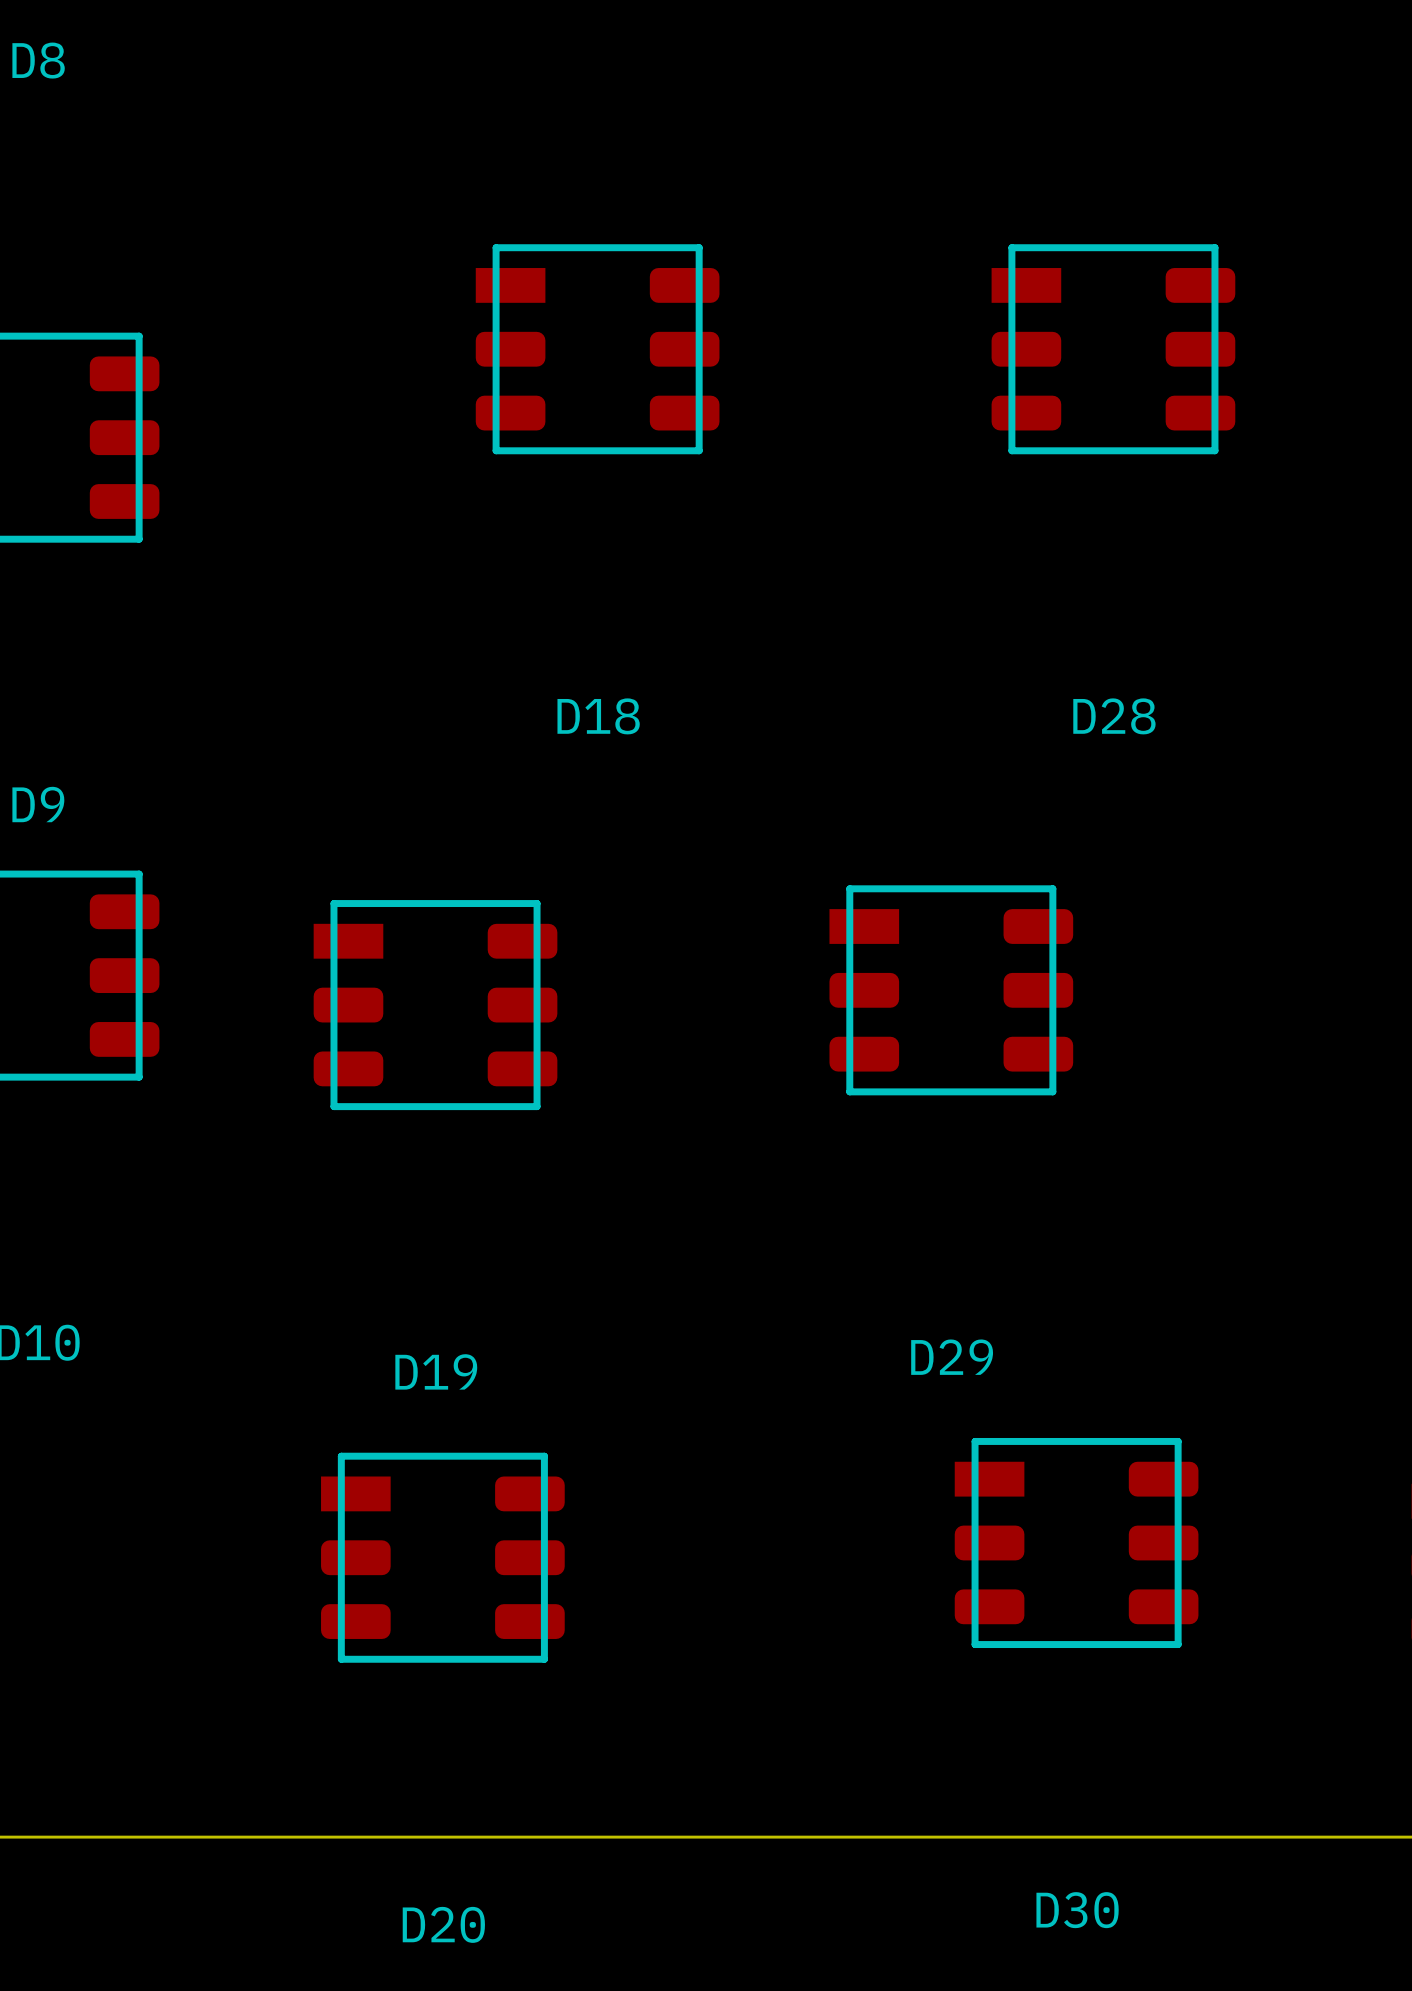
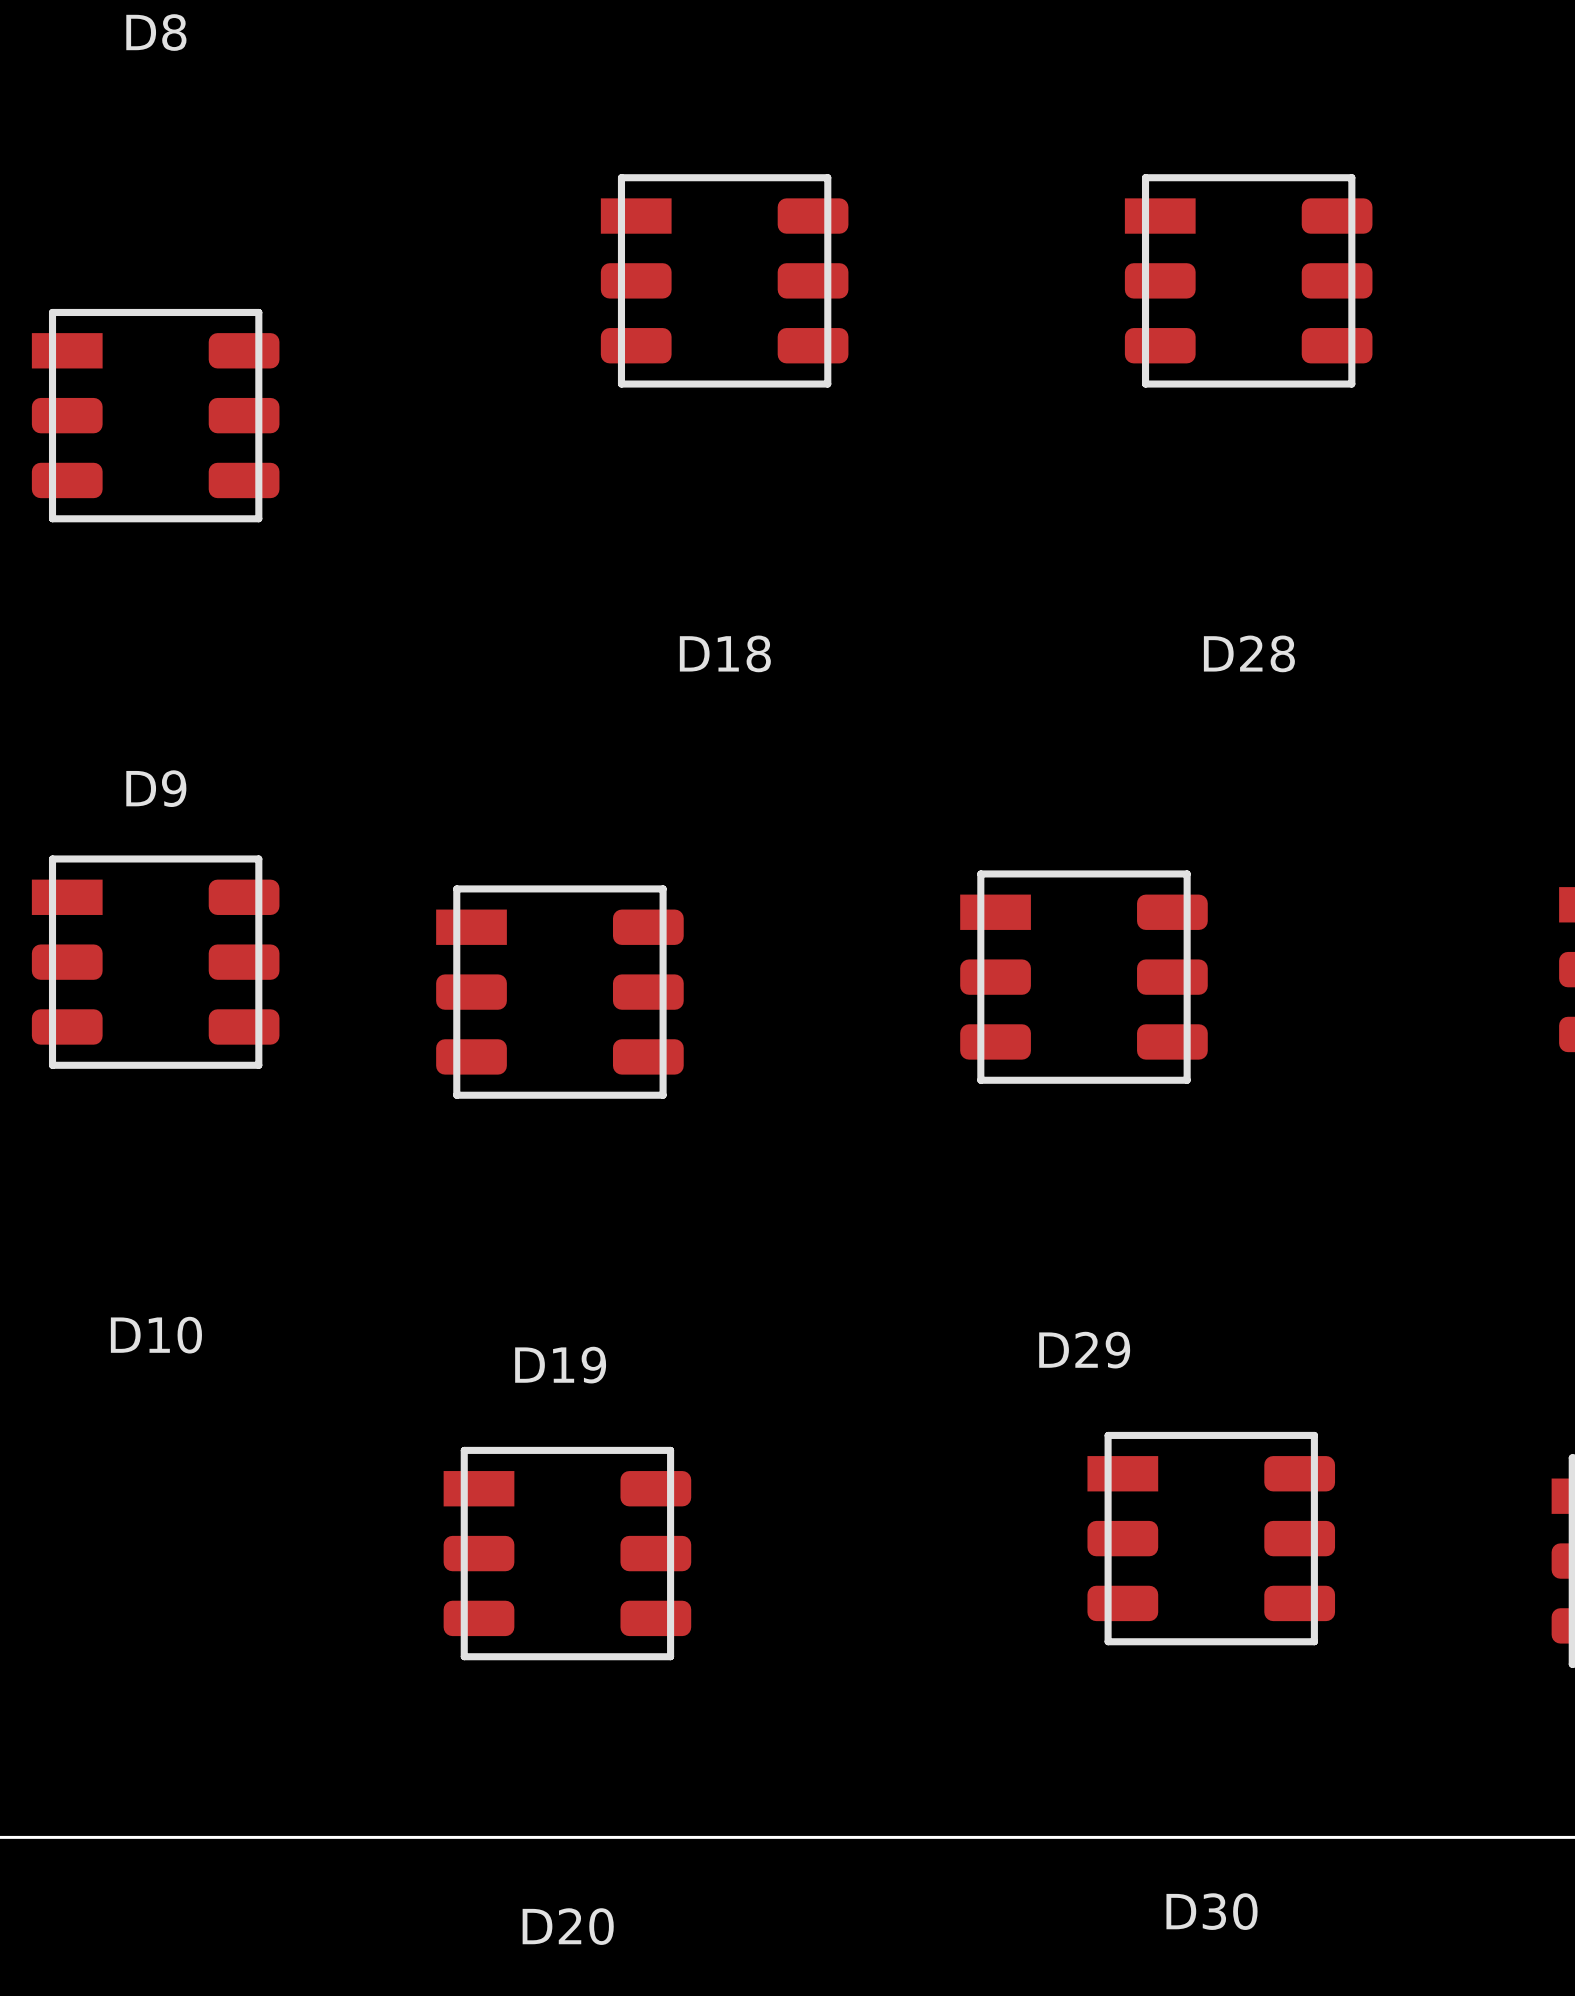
D18 position: (597, 349) -> (724, 280)
D28 position: (1113, 349) -> (1248, 280)

